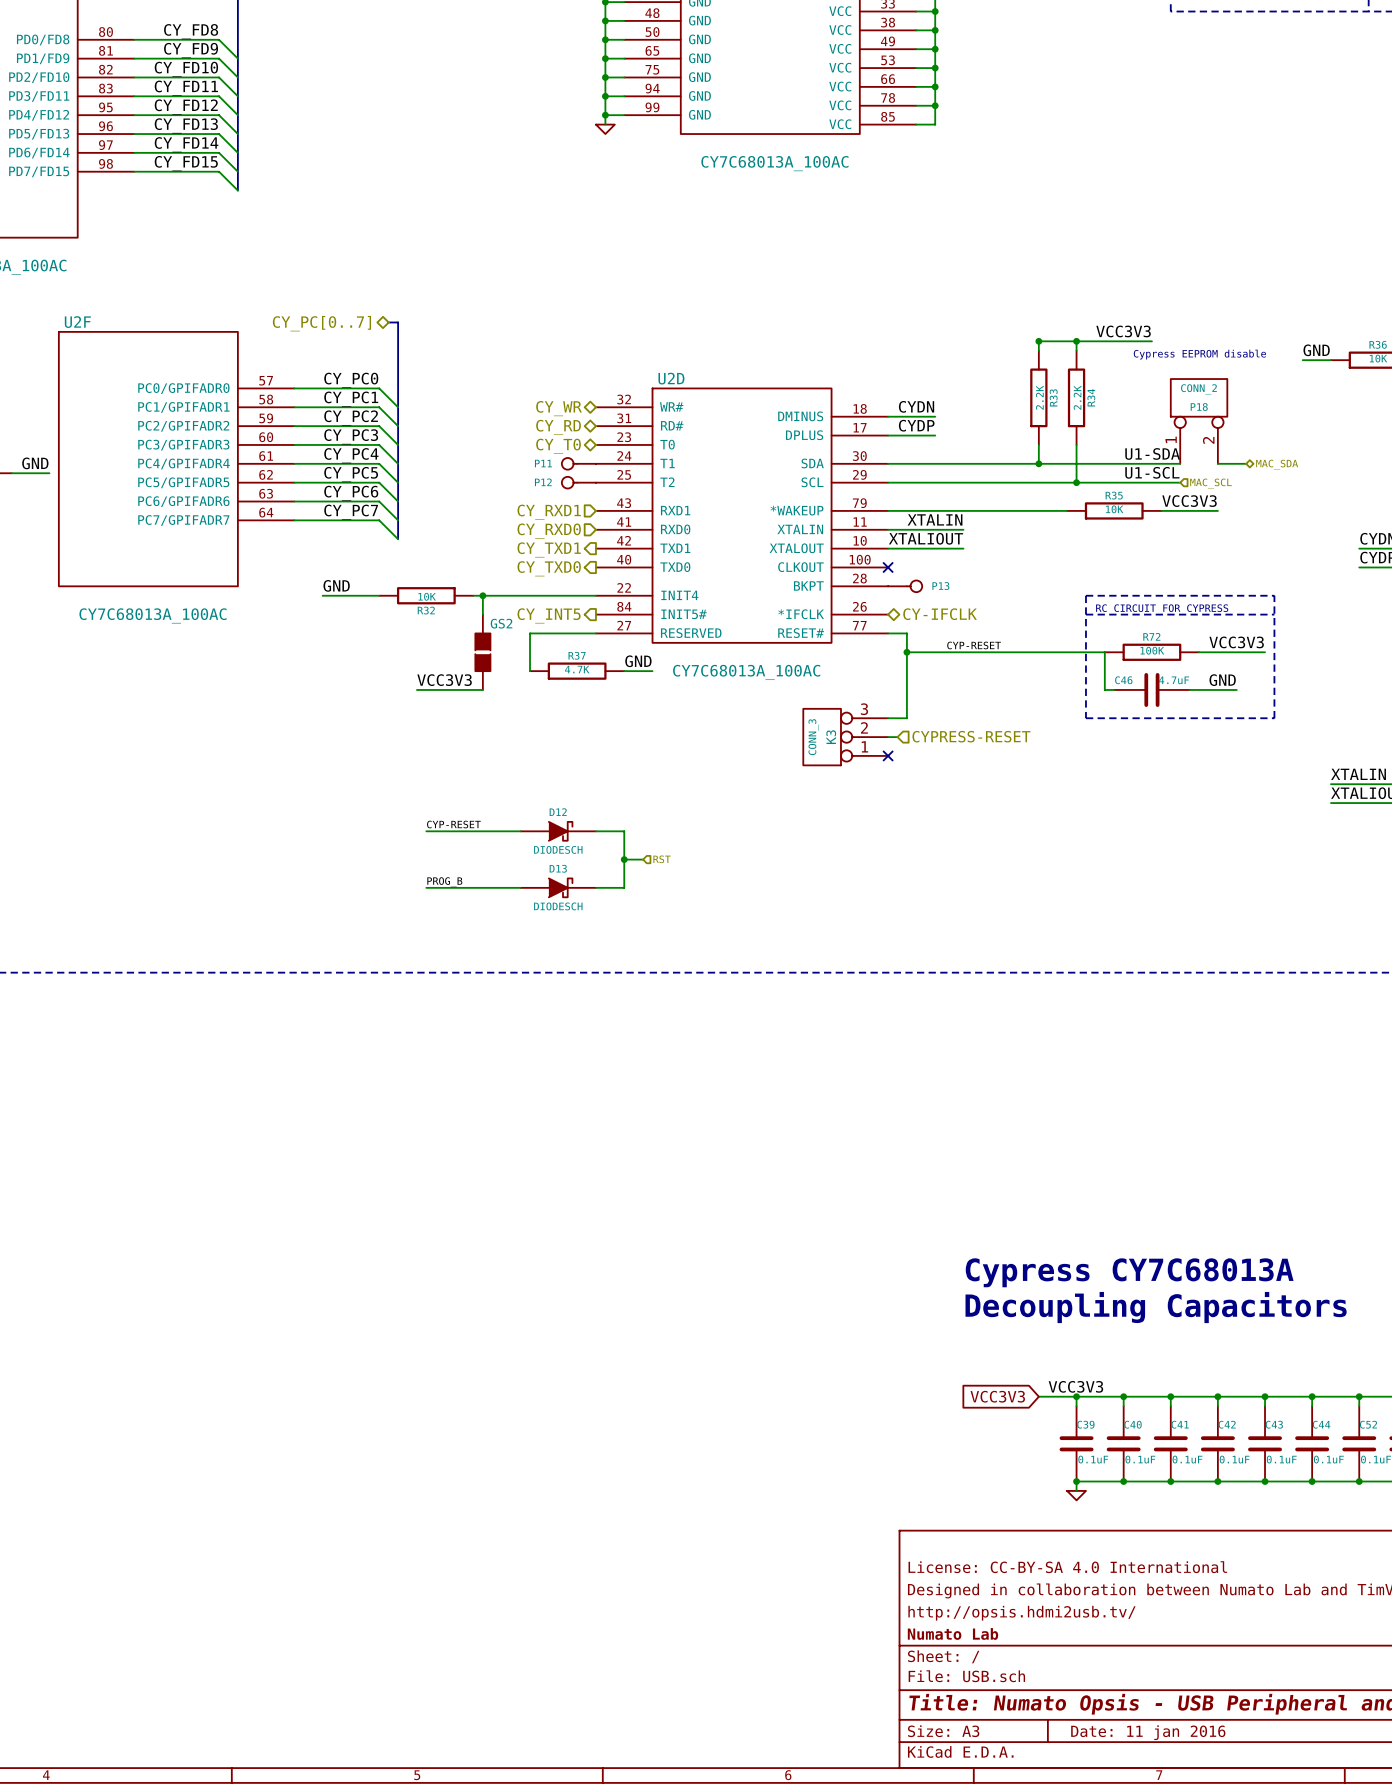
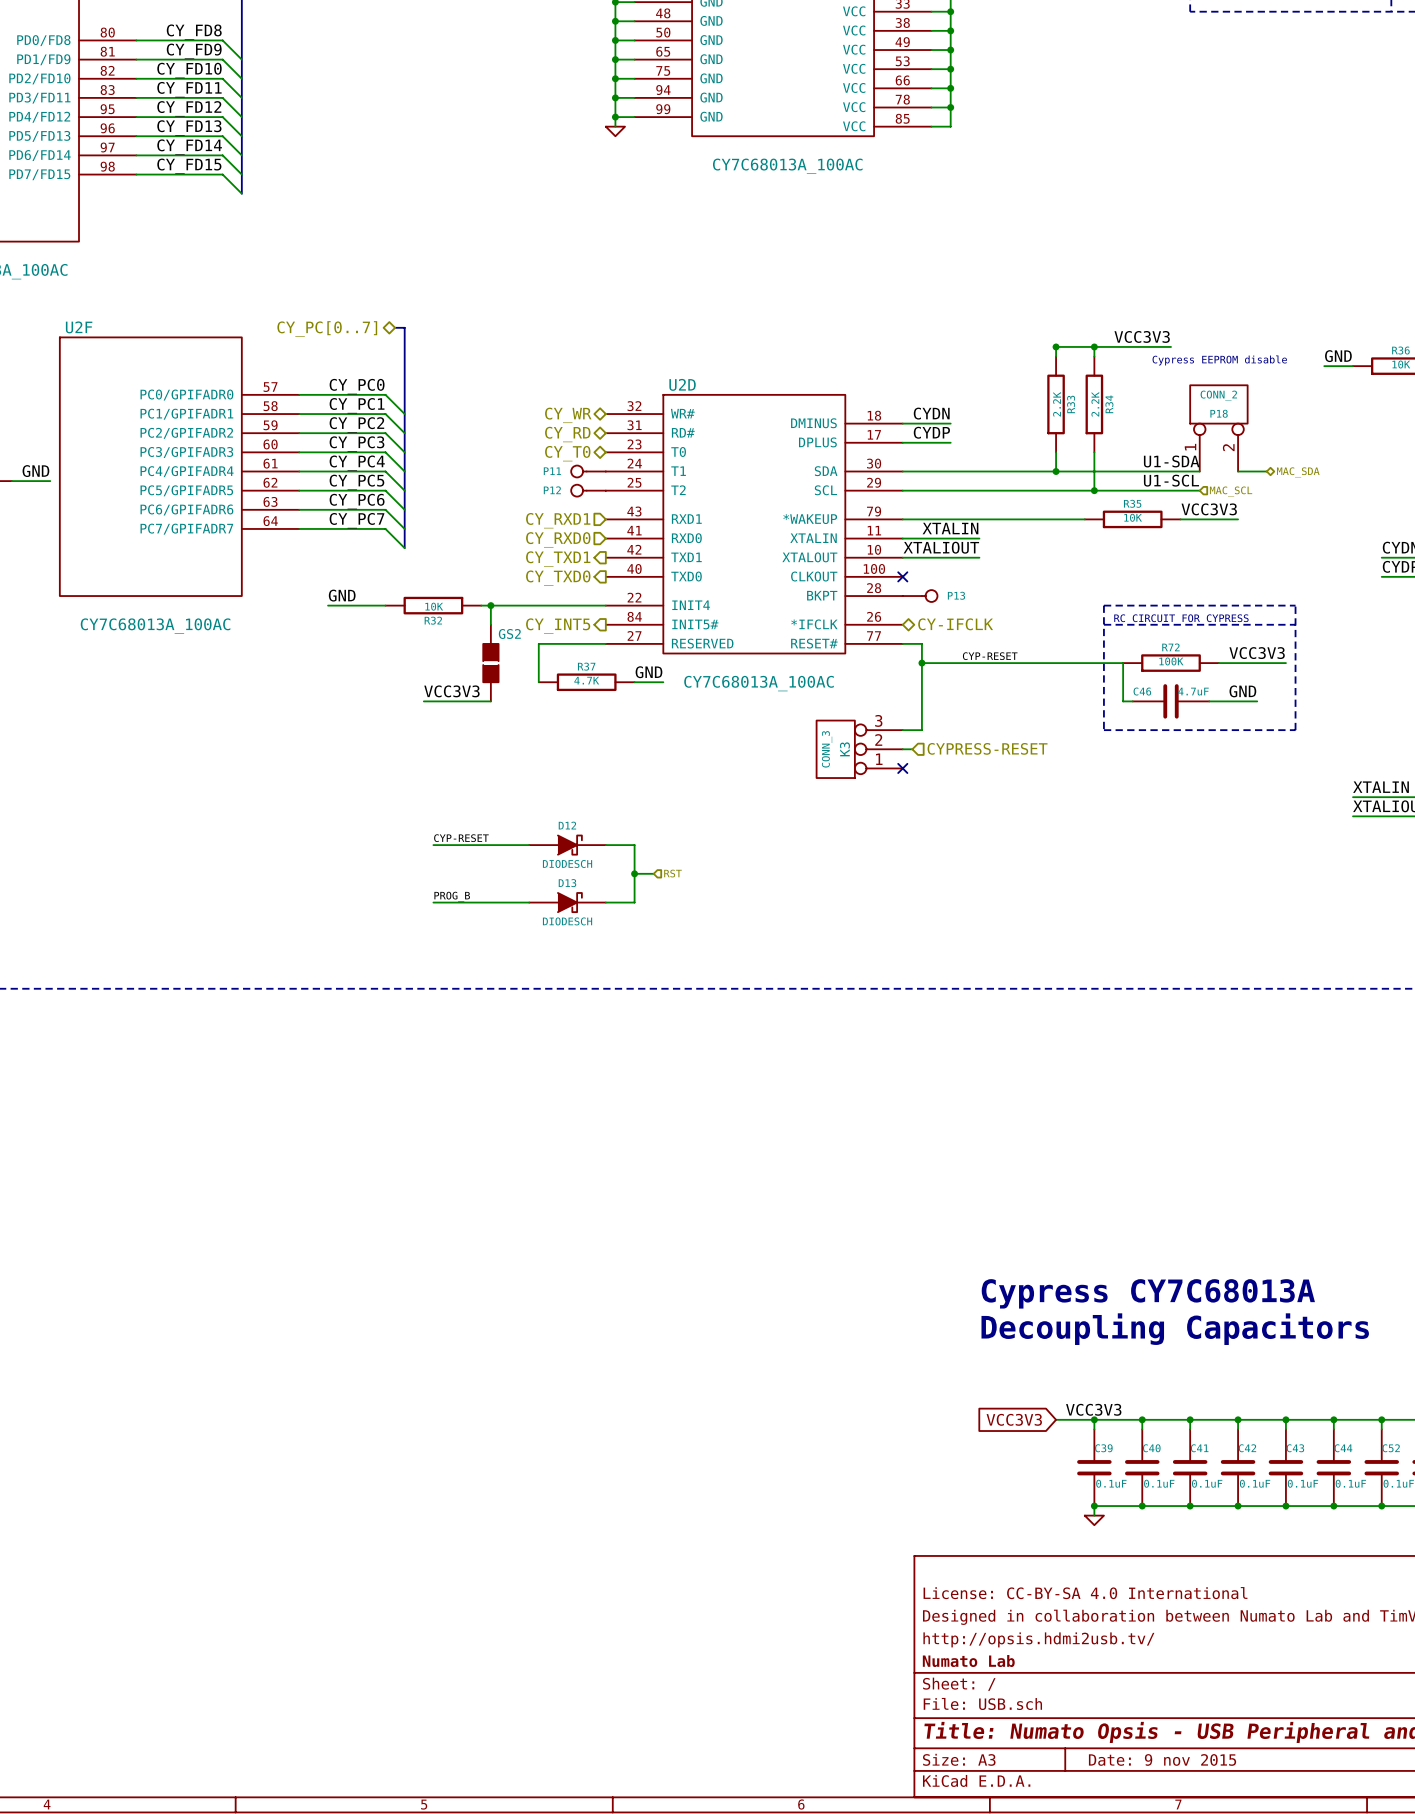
title block: Date: 11 jan 2016 (1148, 1732) -> Date: 9 nov 2015 (1162, 1759)

